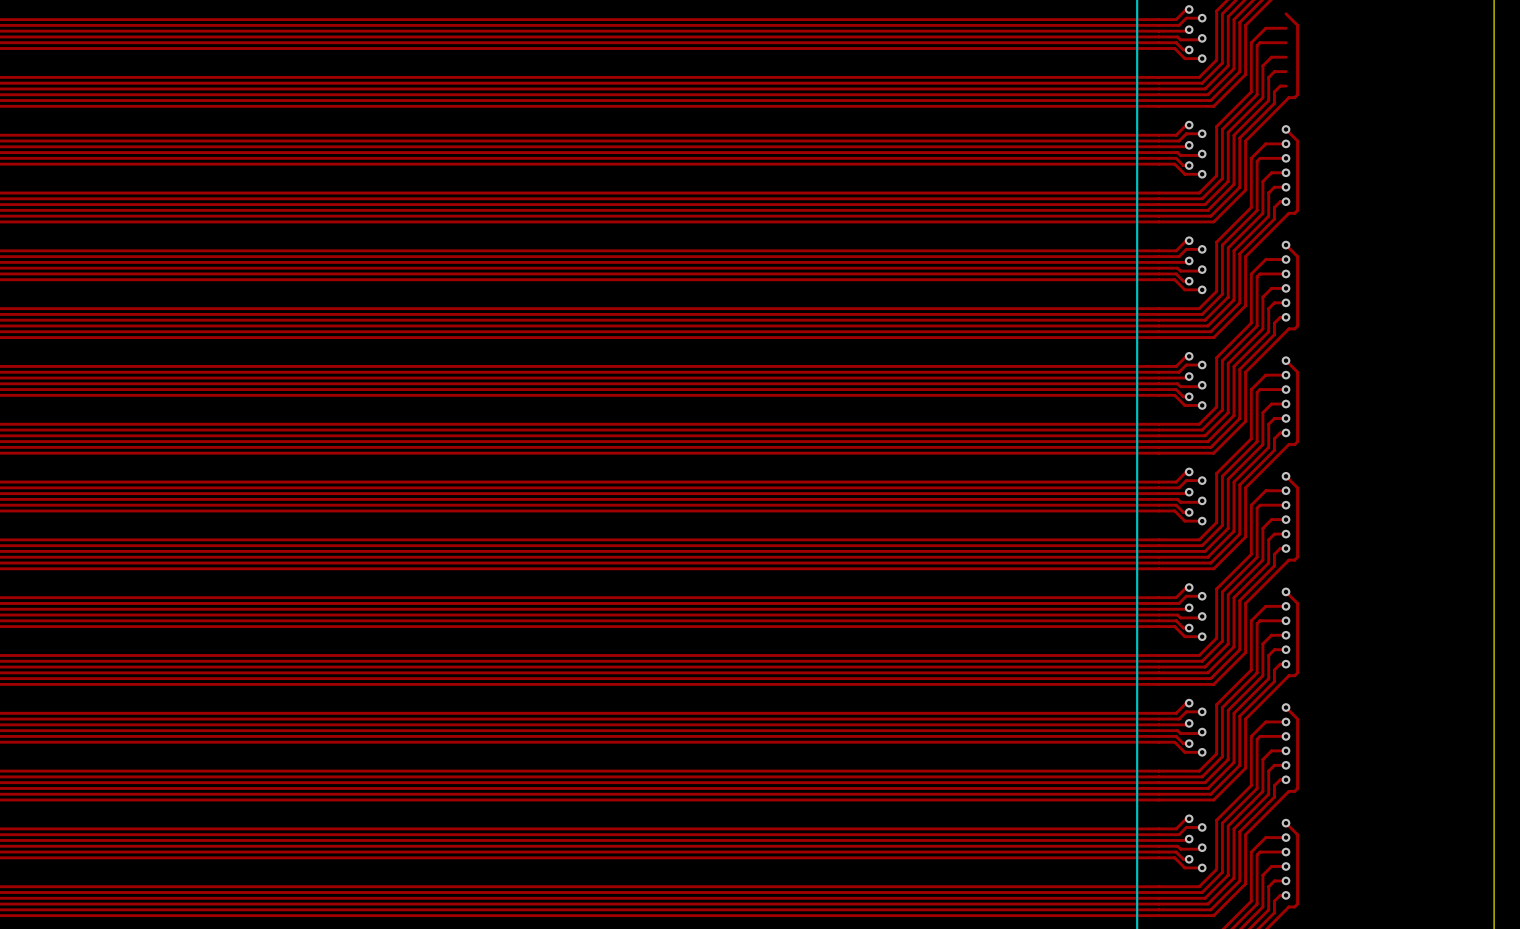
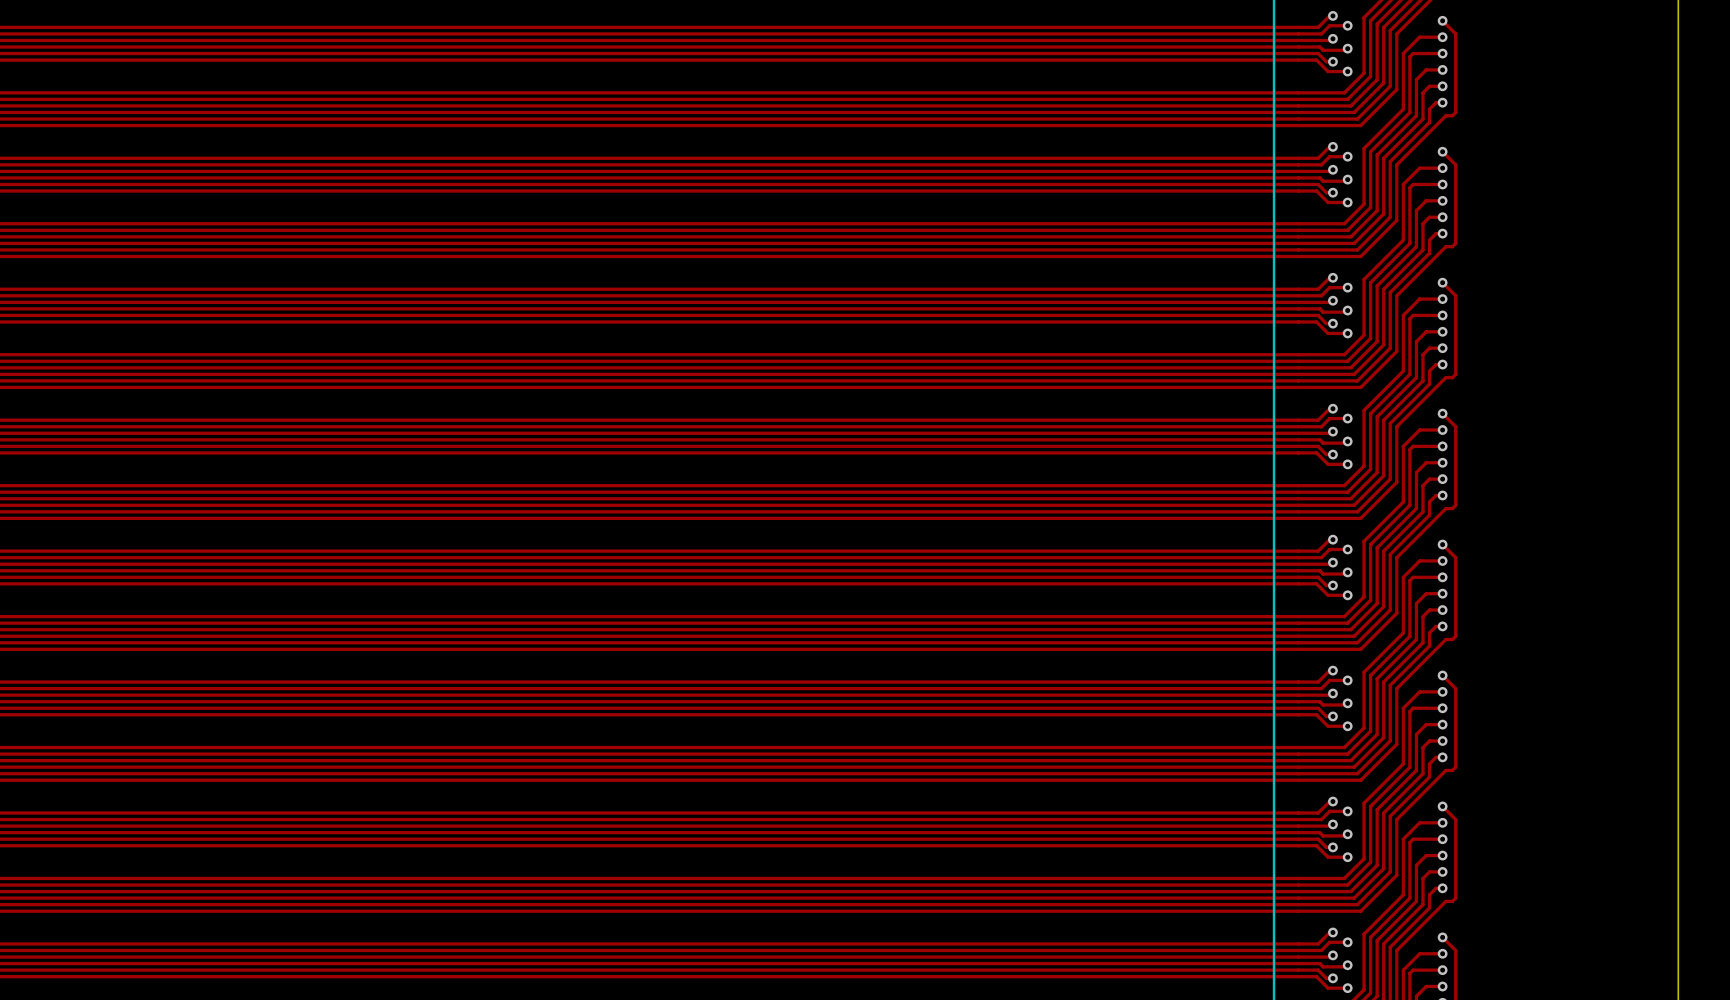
via: none -> (1442, 20)
via: none -> (1442, 37)
via: none -> (1442, 53)
via: none -> (1442, 69)
via: none -> (1442, 86)
via: none -> (1442, 102)

